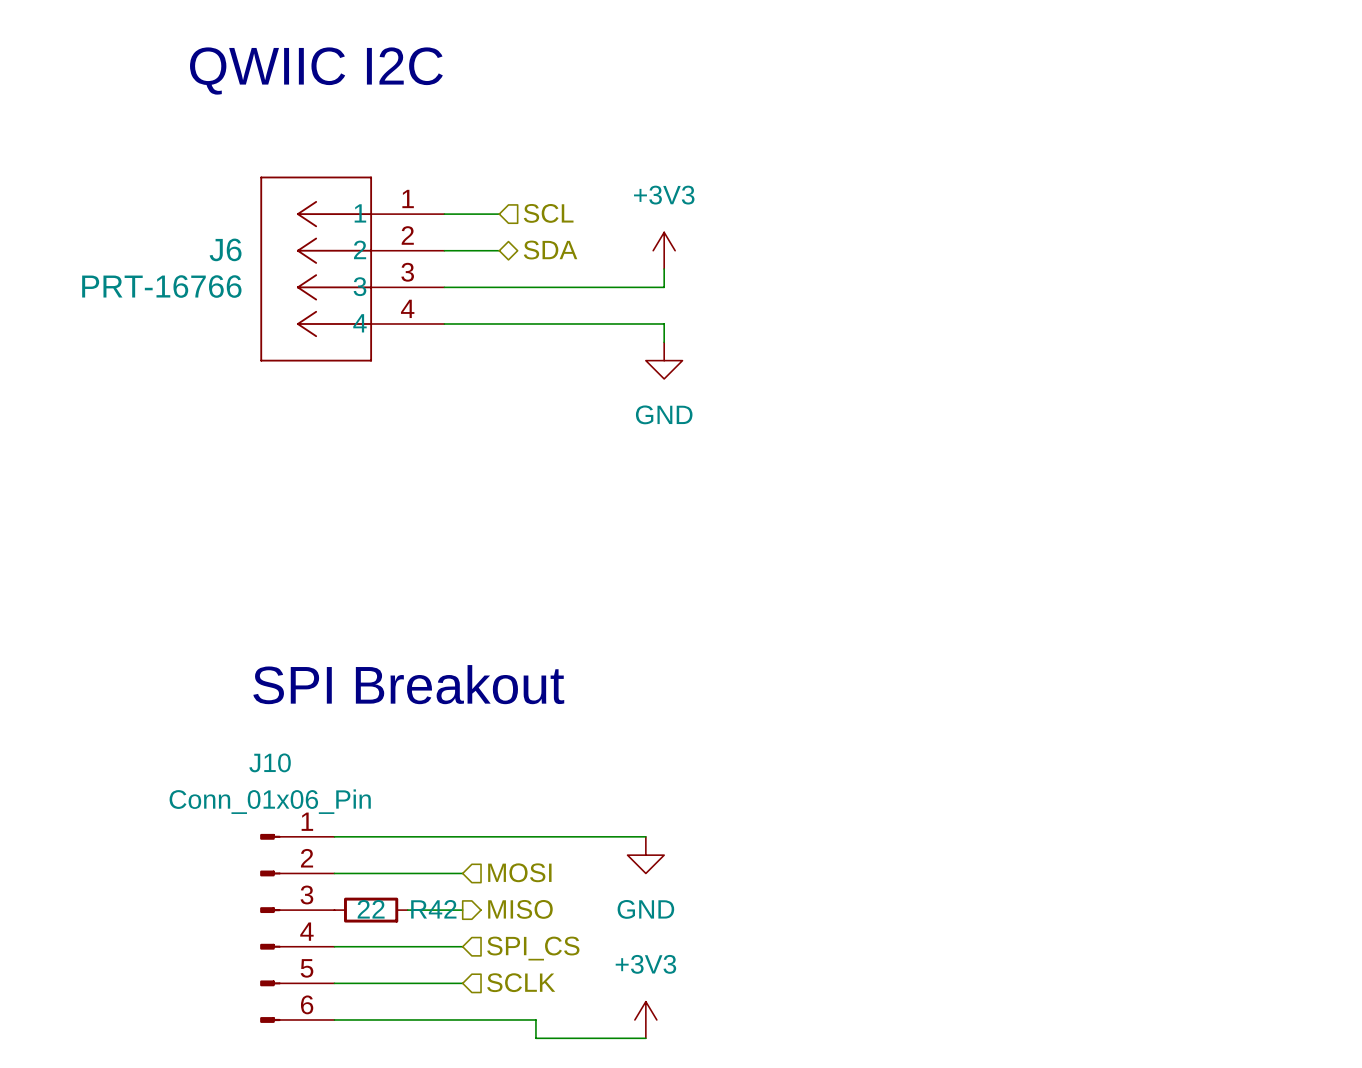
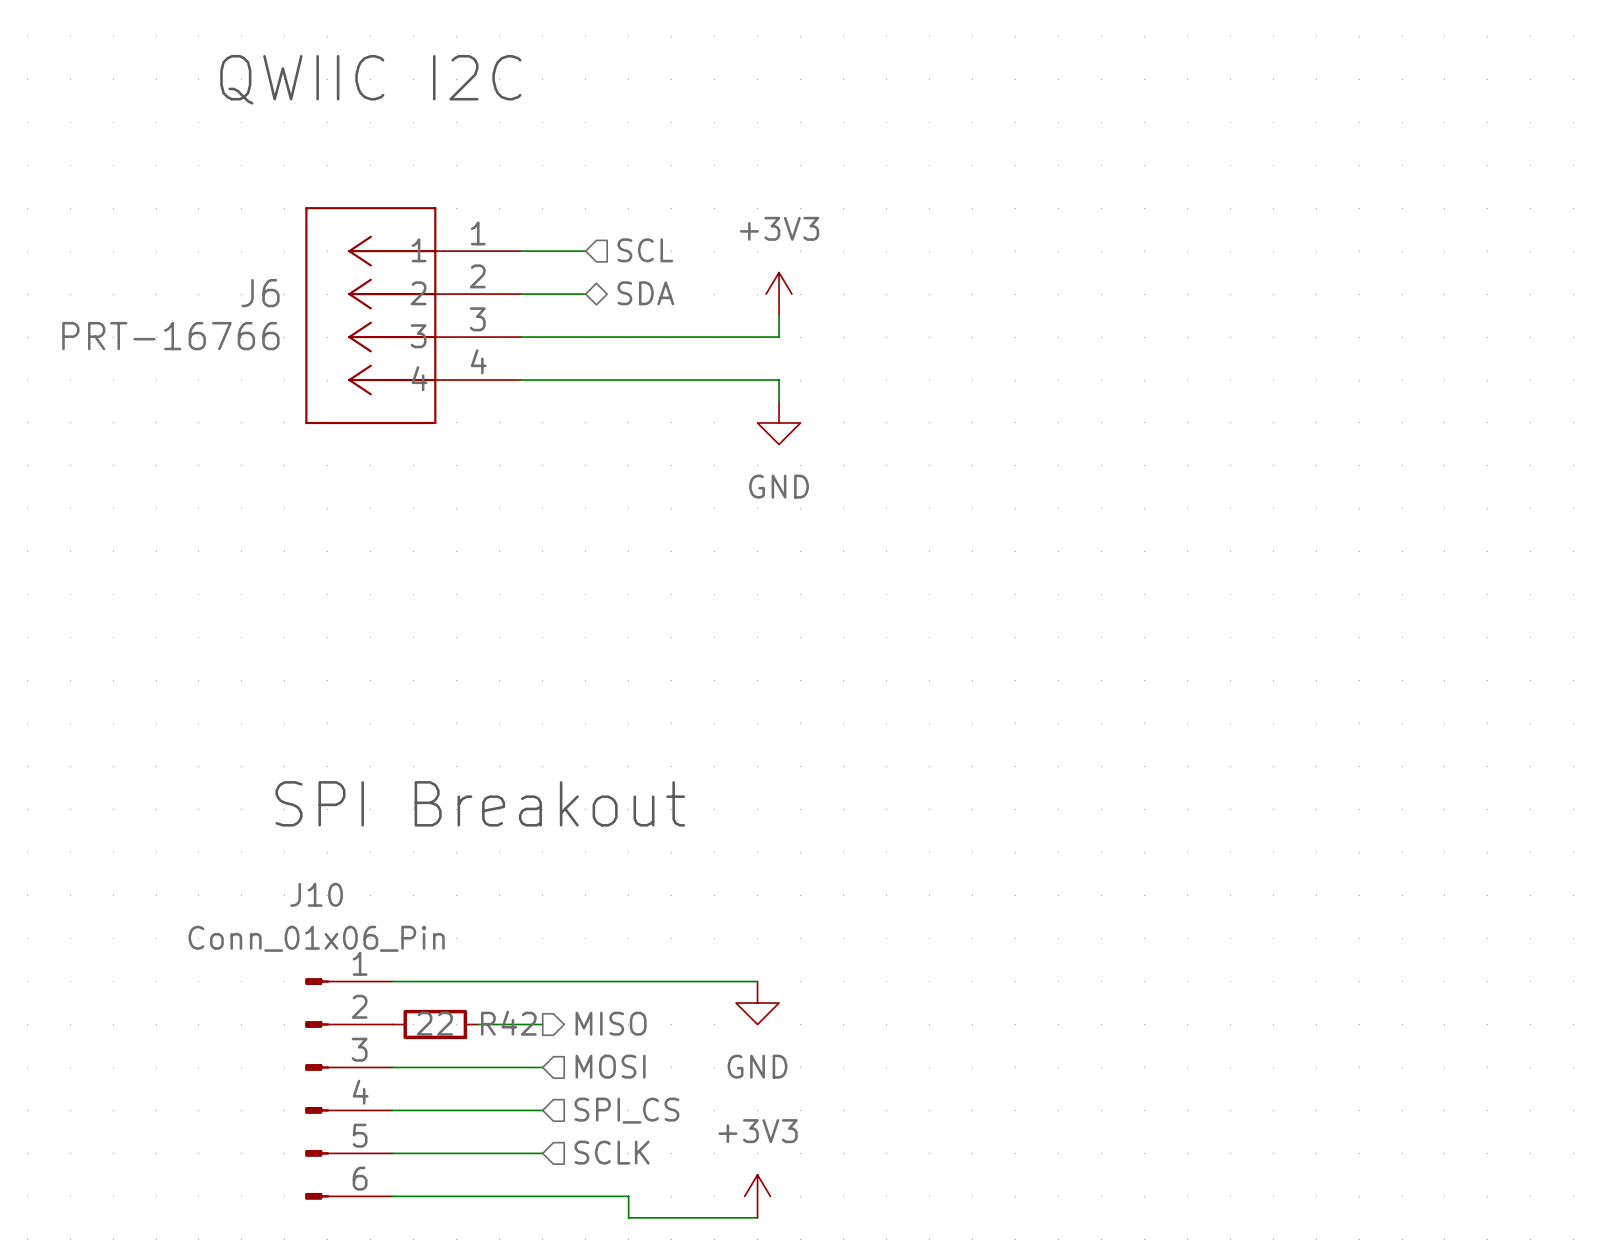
hierarchical label shape: input (519, 872) -> output (611, 1023)
hierarchical label: MOSI (519, 872) -> MISO (611, 1023)
wire: (334, 873) (407, 873) -> (392, 1067) (478, 1067)
hierarchical label shape: output (520, 909) -> input (610, 1066)
hierarchical label: MISO (520, 909) -> MOSI (610, 1066)
R42 position: (371, 910) -> (435, 1024)

